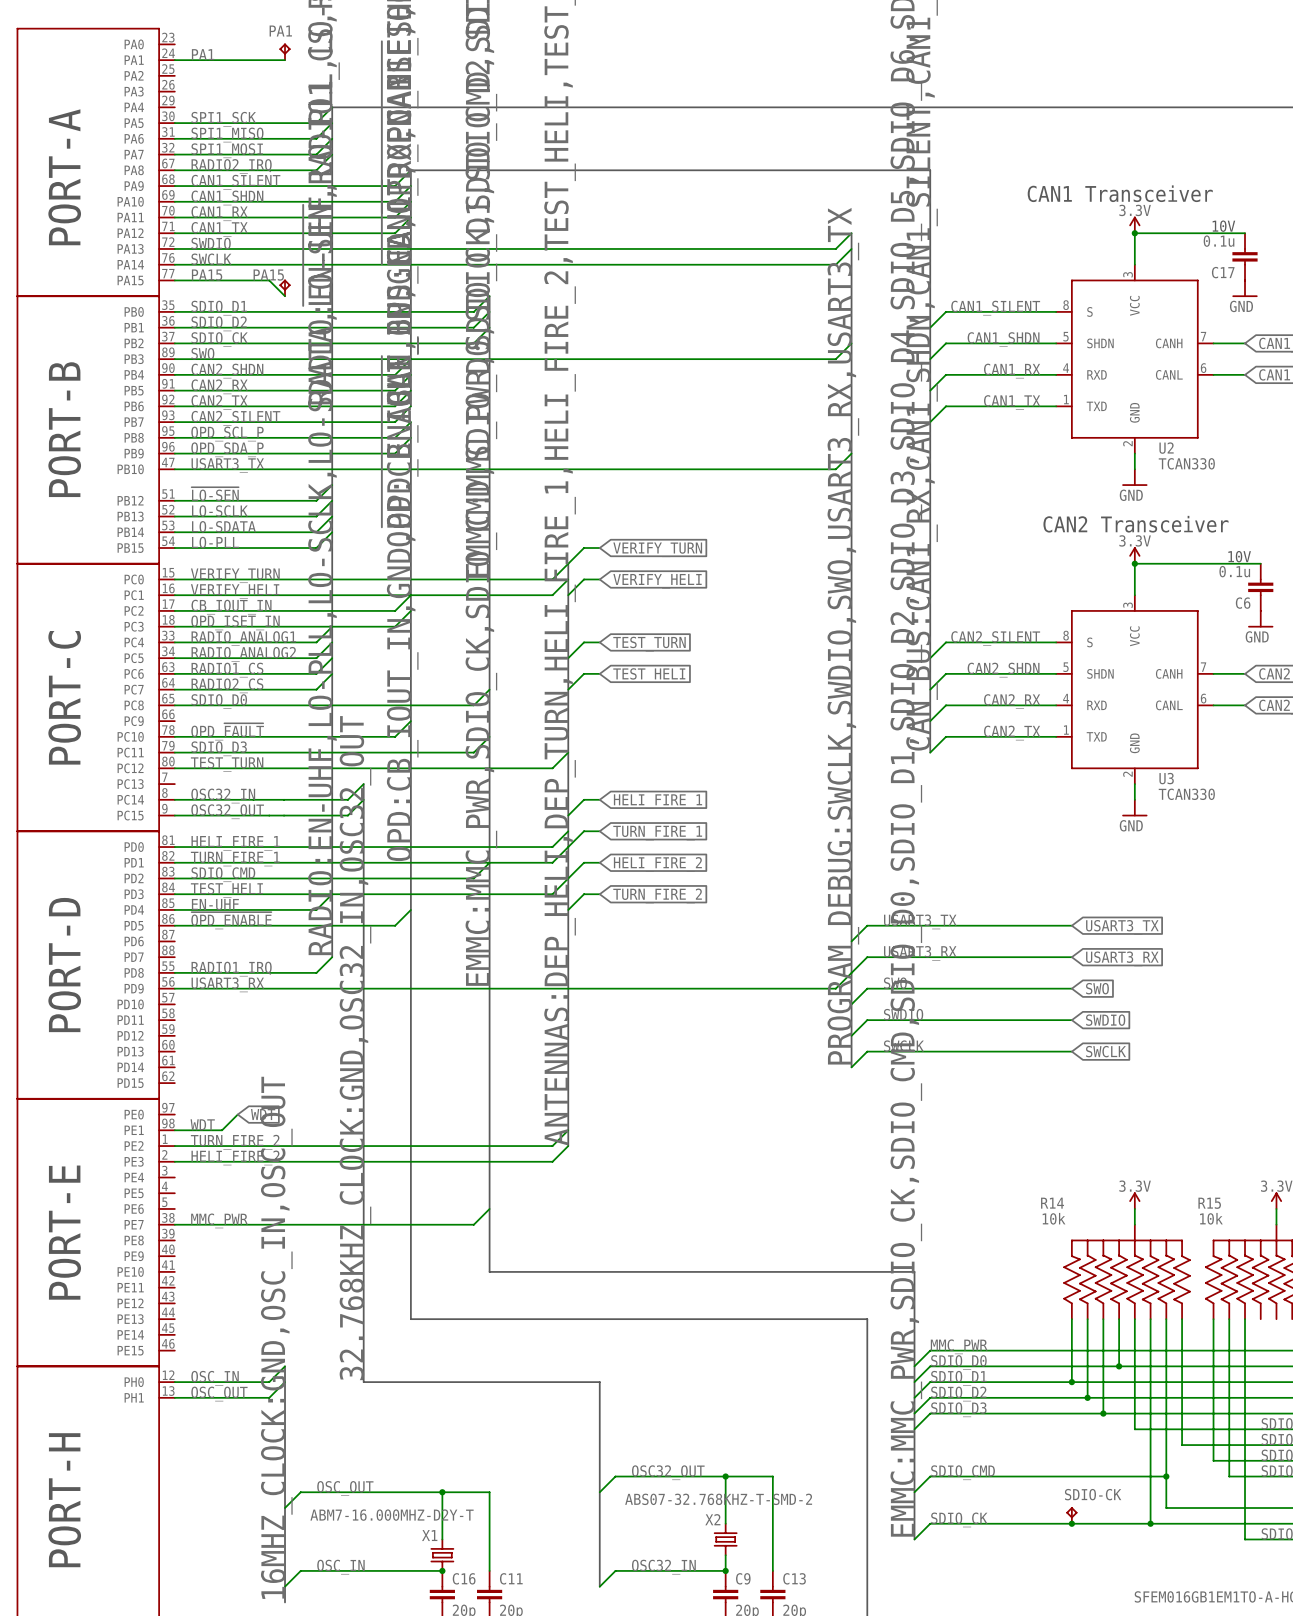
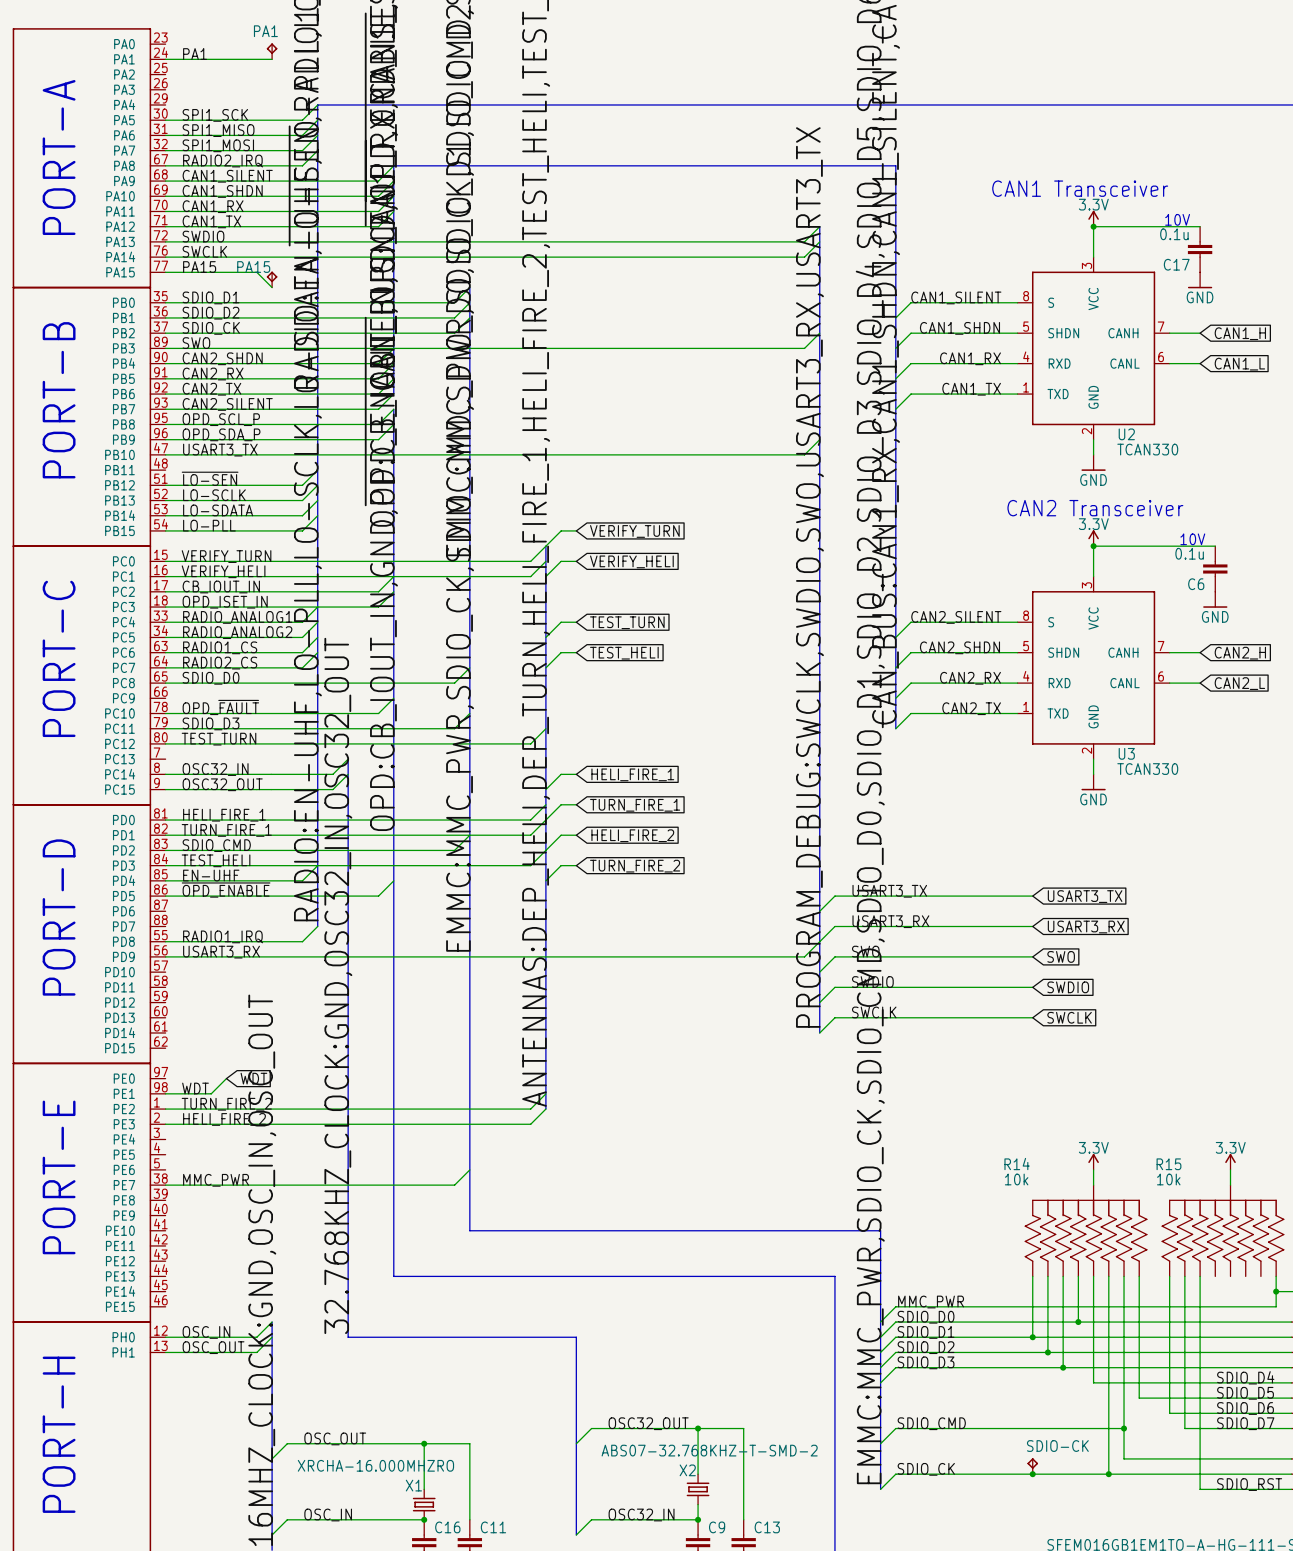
part symbol: [16, 295, 175, 565] -> [12, 286, 166, 547]
X1 value: ABM7-16.000MHZ-D2Y-T (392, 1515) -> XRCHA-16.000MHZRO (375, 1465)

